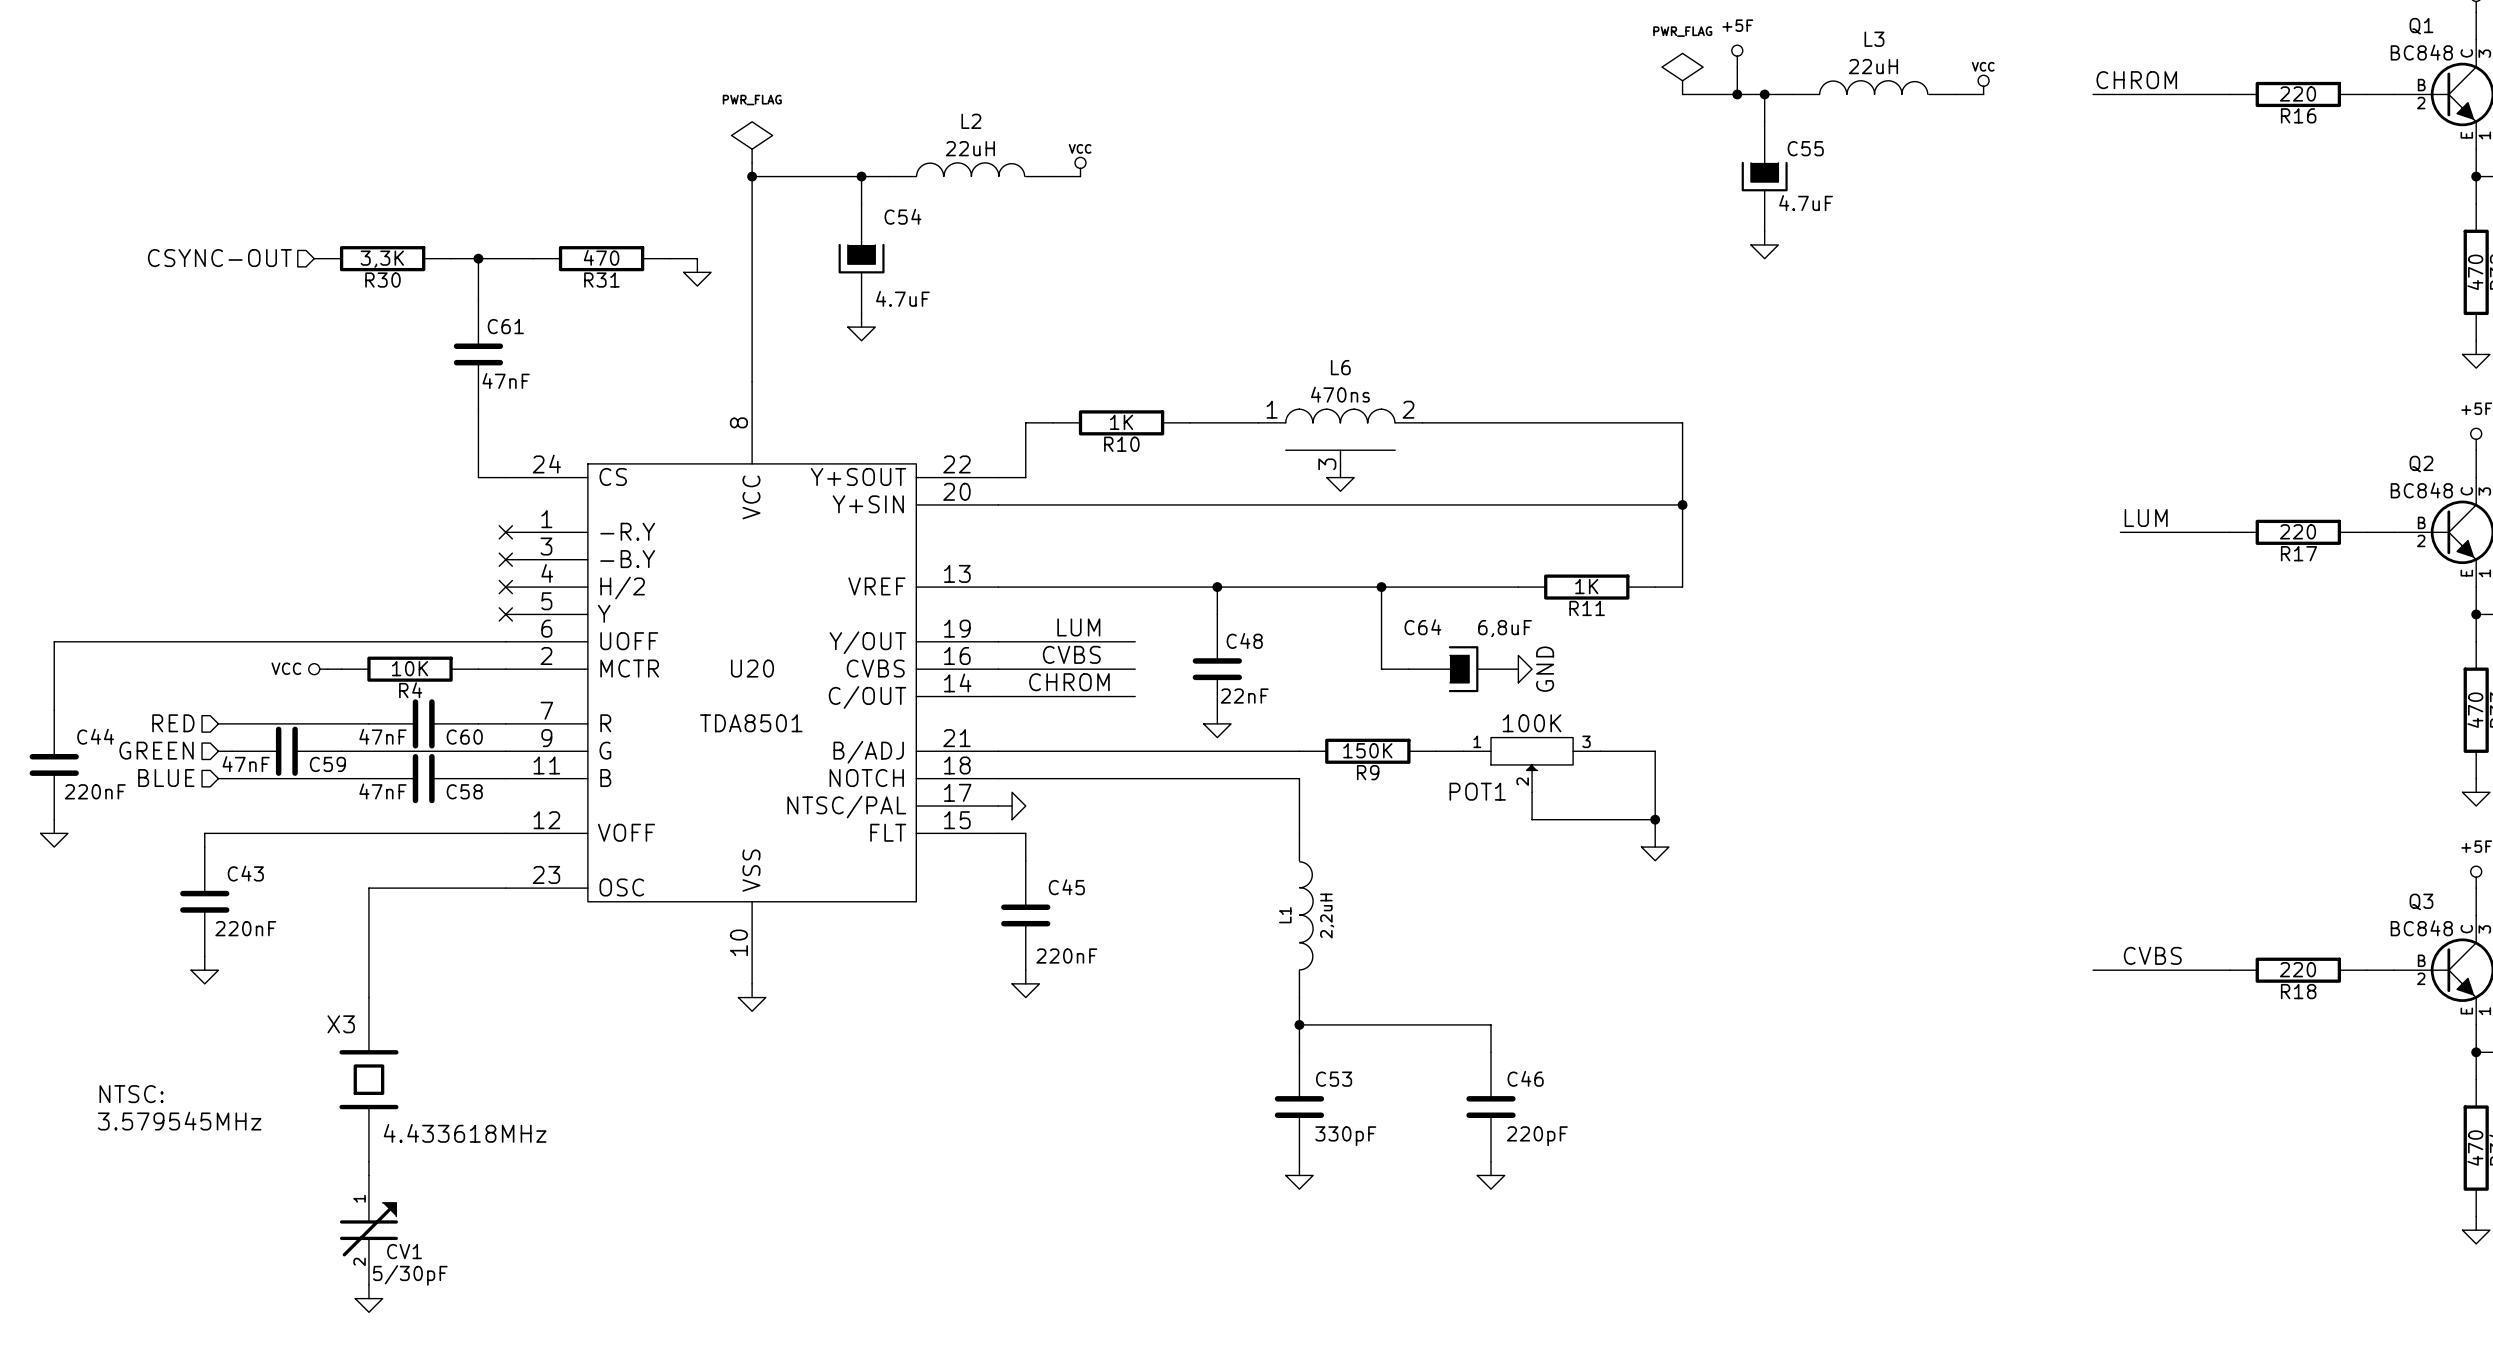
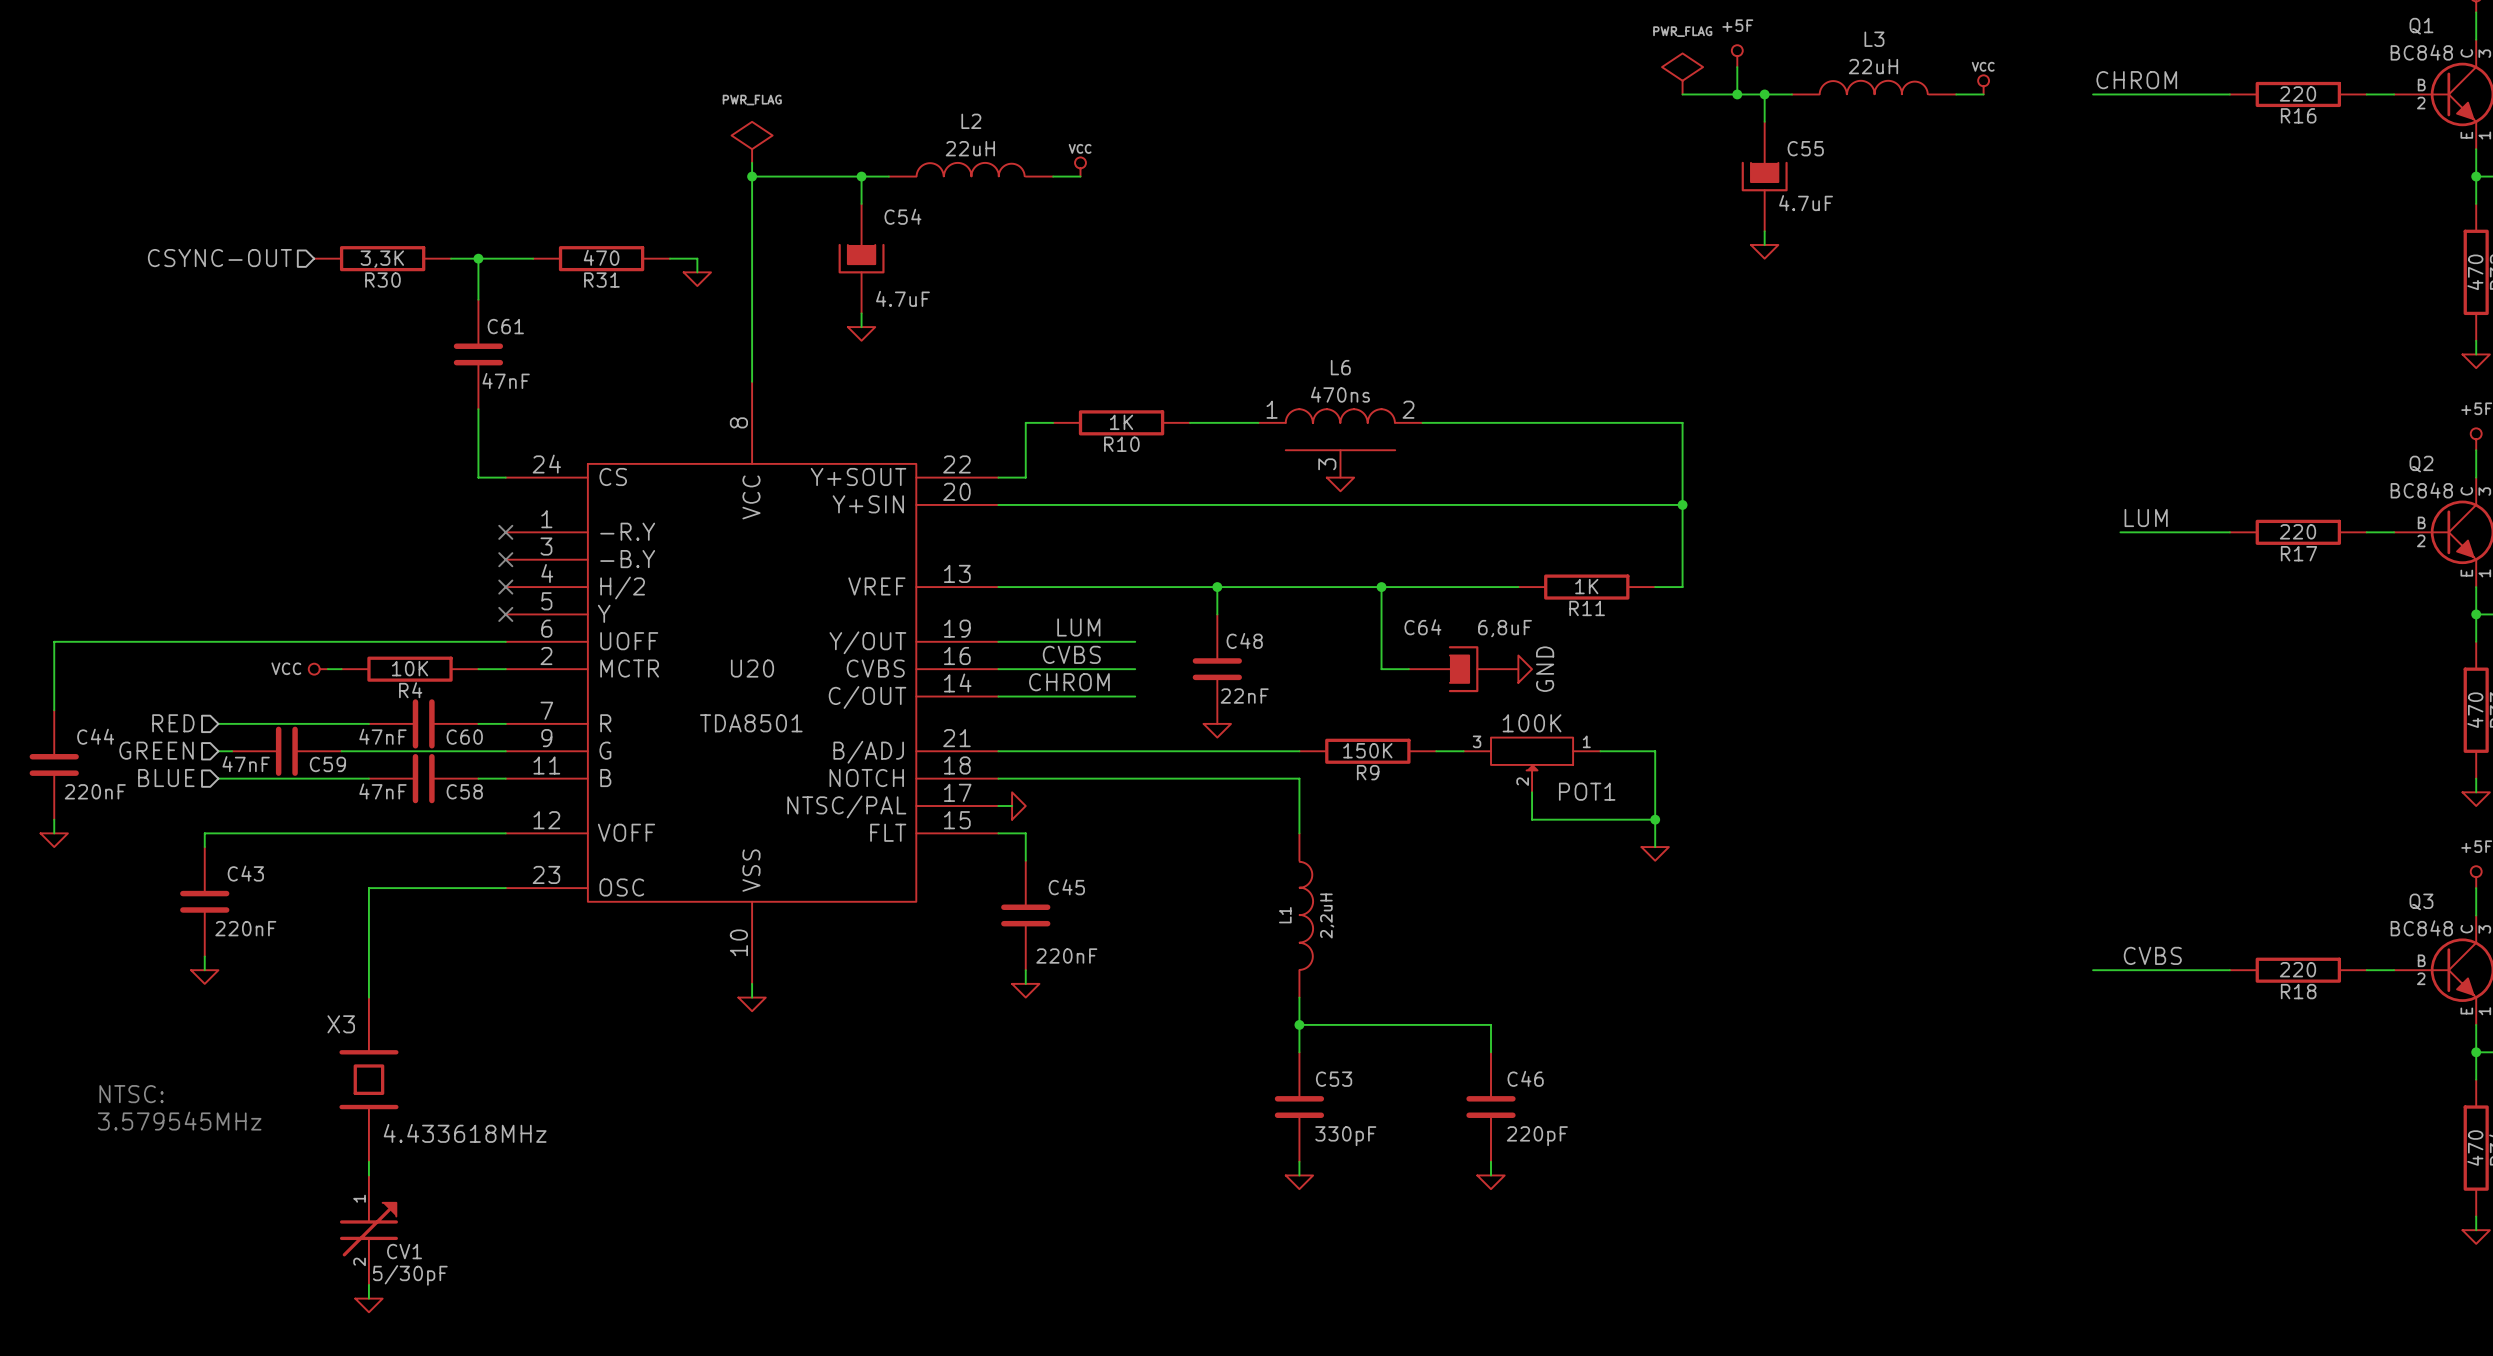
POT1 flip: as is (1532, 754) -> left-right (1532, 754)

